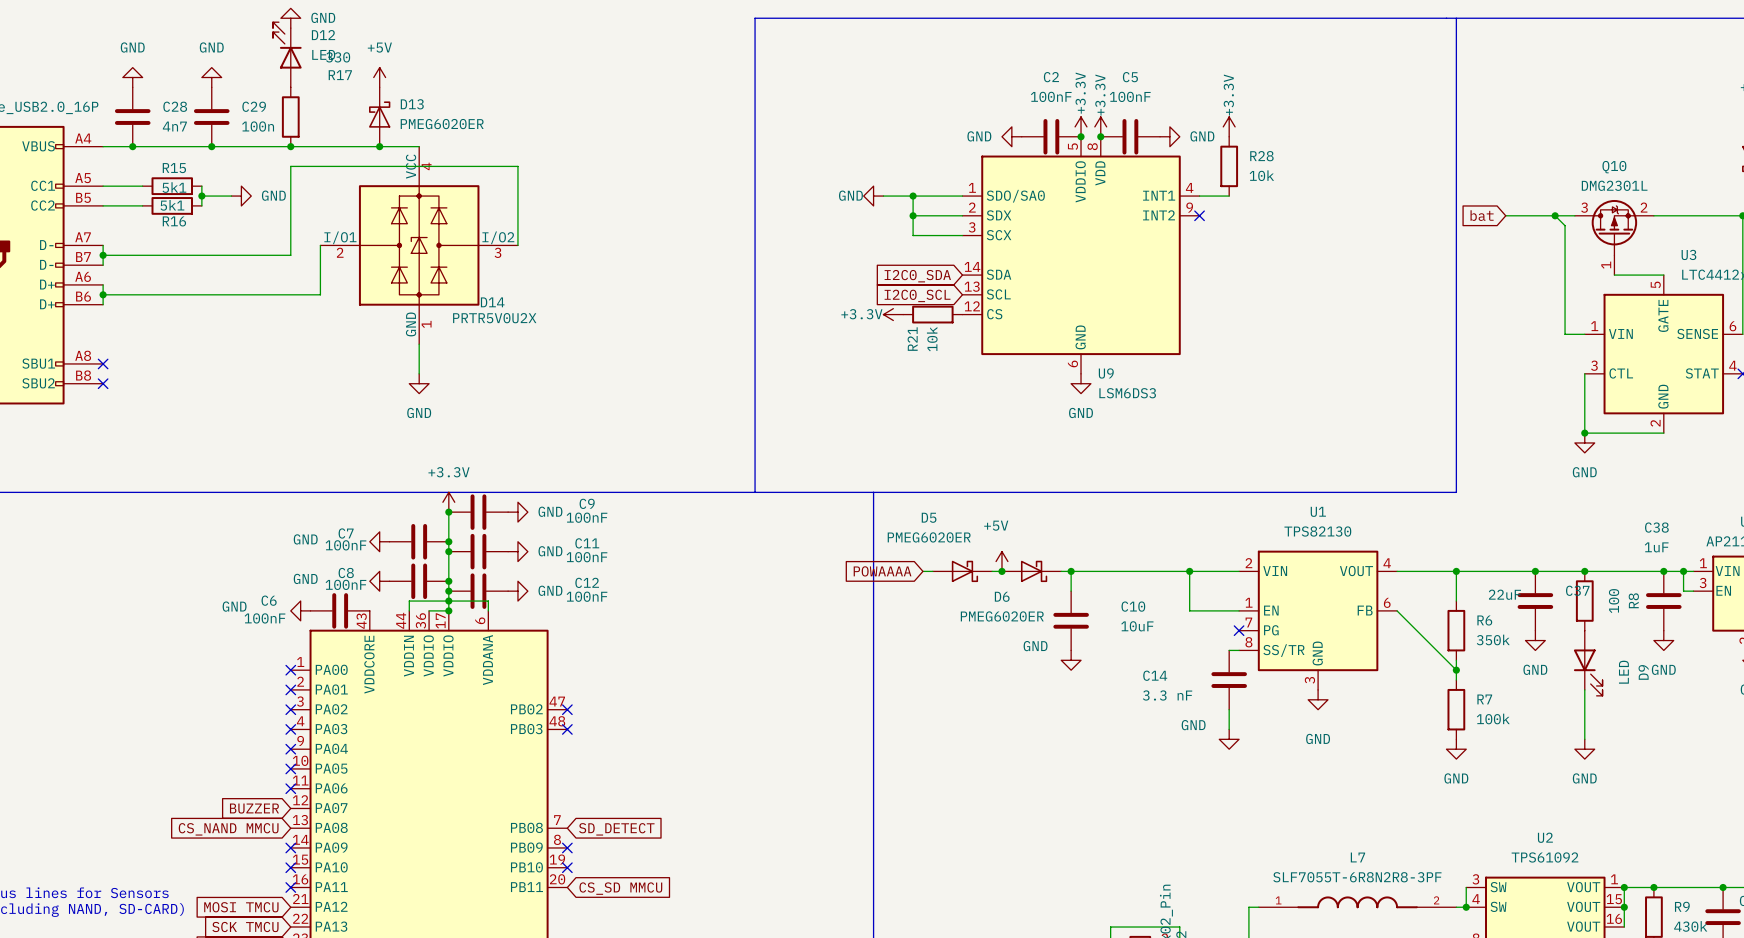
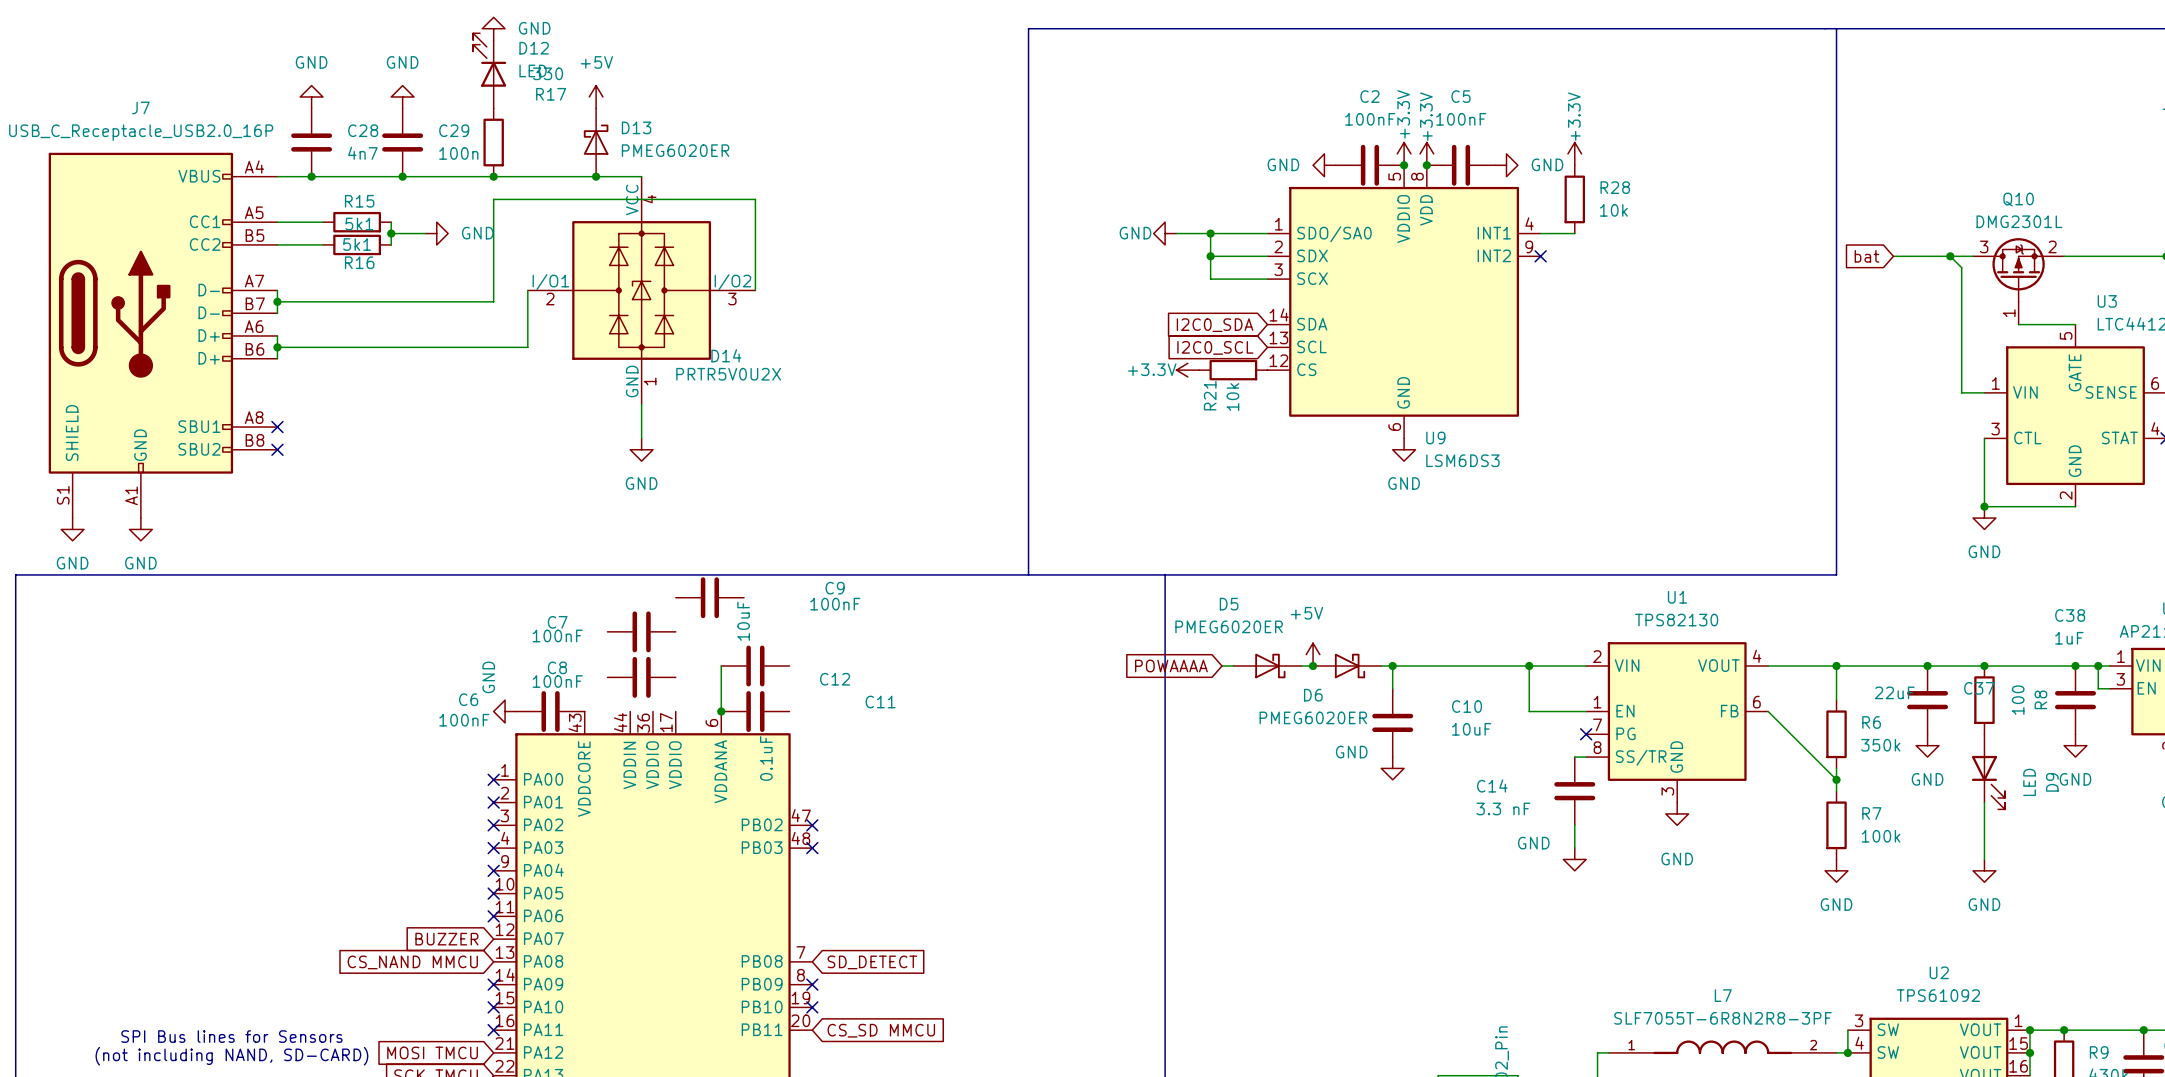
power symbol: +3.3V (448, 502) -> none
wire: (448, 512) (448, 610) (429, 610) -> none
junction: (448, 512) -> none
power symbol: GND (517, 512) -> none
power symbol: GND (379, 541) -> none
junction: (448, 541) -> none
junction: (448, 551) -> none
C11 position: (478, 551) -> (755, 711)
power symbol: GND (517, 551) -> none
C11 value: 100nF (586, 557) -> 0.1uF (766, 758)
power symbol: GND (379, 581) -> none
junction: (448, 581) -> none
junction: (448, 591) -> none
C12 position: (478, 591) -> (755, 666)
power symbol: GND (517, 591) -> none
C12 value: 100nF (586, 596) -> 10uF (743, 621)
junction: (448, 601) -> none
wire: (488, 601) (409, 601) (409, 610) -> (721, 700) (721, 666)
power symbol text rotation: 0° (234, 606) -> 90° counterclockwise (488, 677)
power symbol text position: GND (234, 606) -> GND (488, 677)
junction: (448, 610) -> none
junction: none -> (721, 711)

